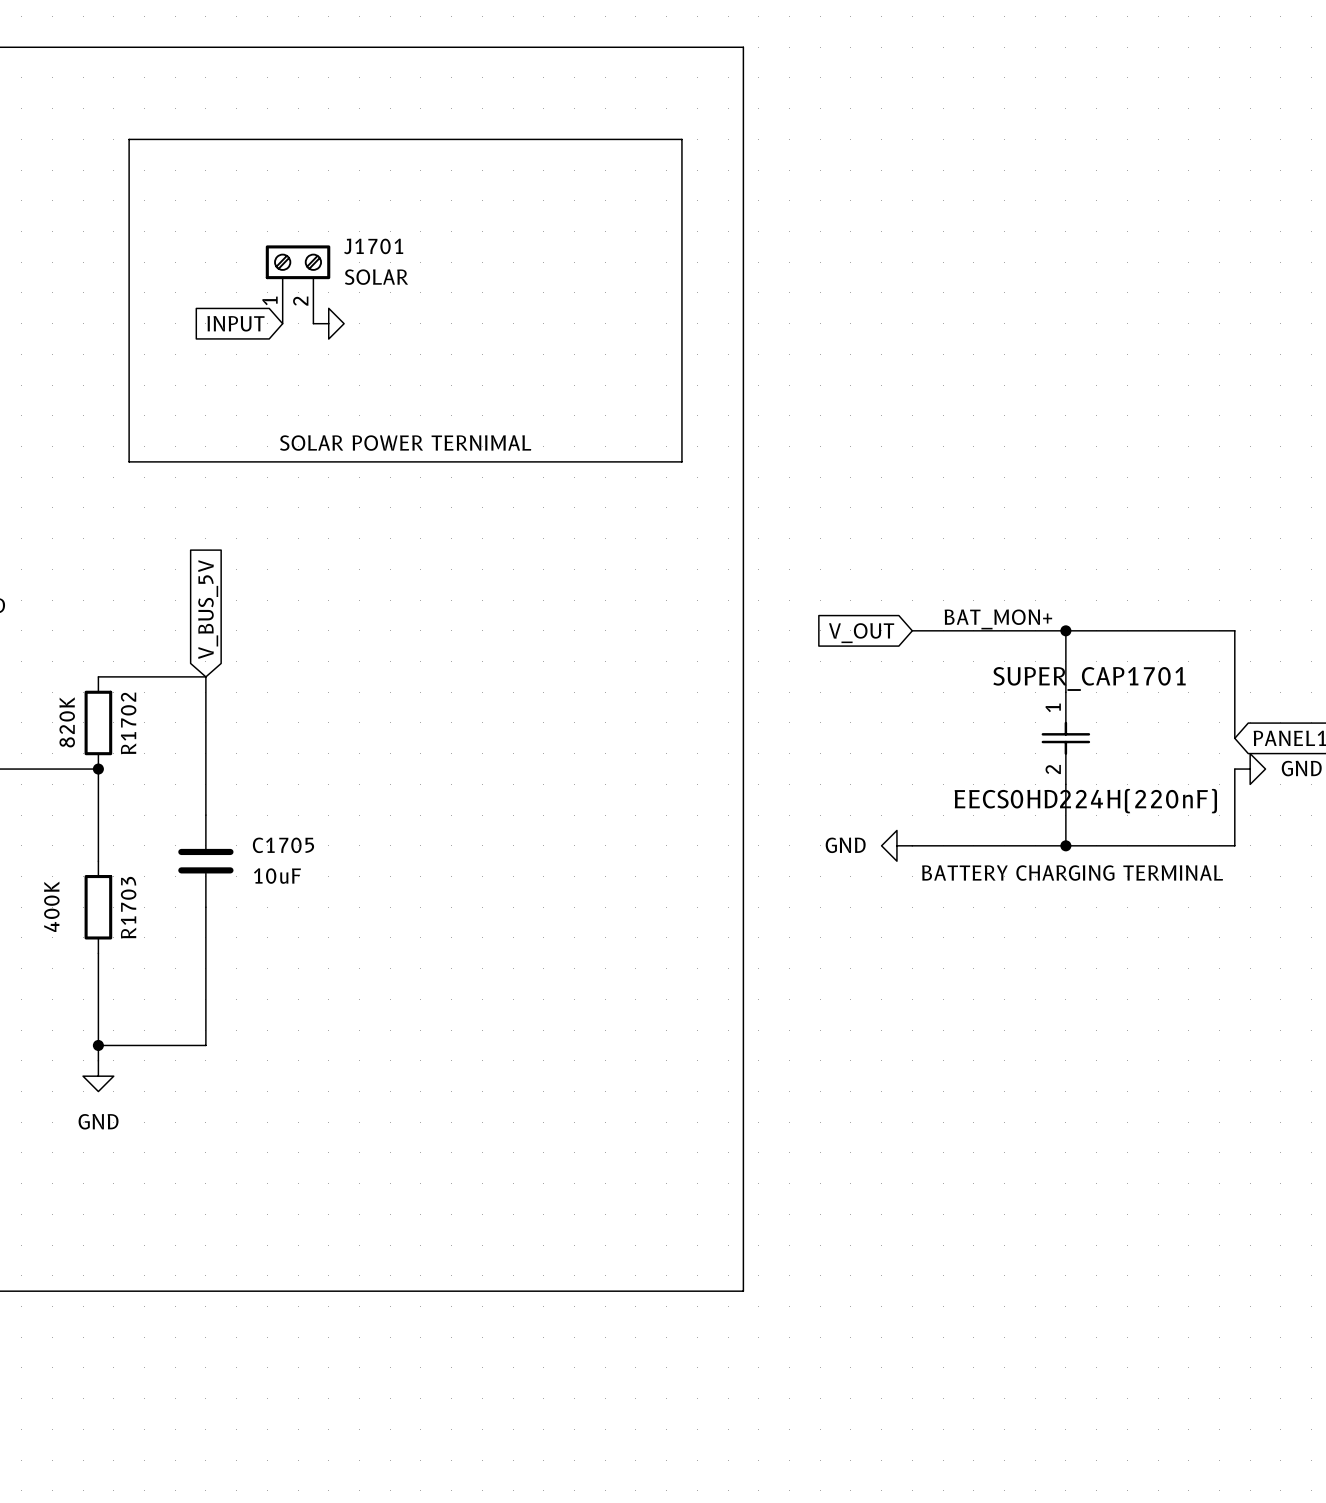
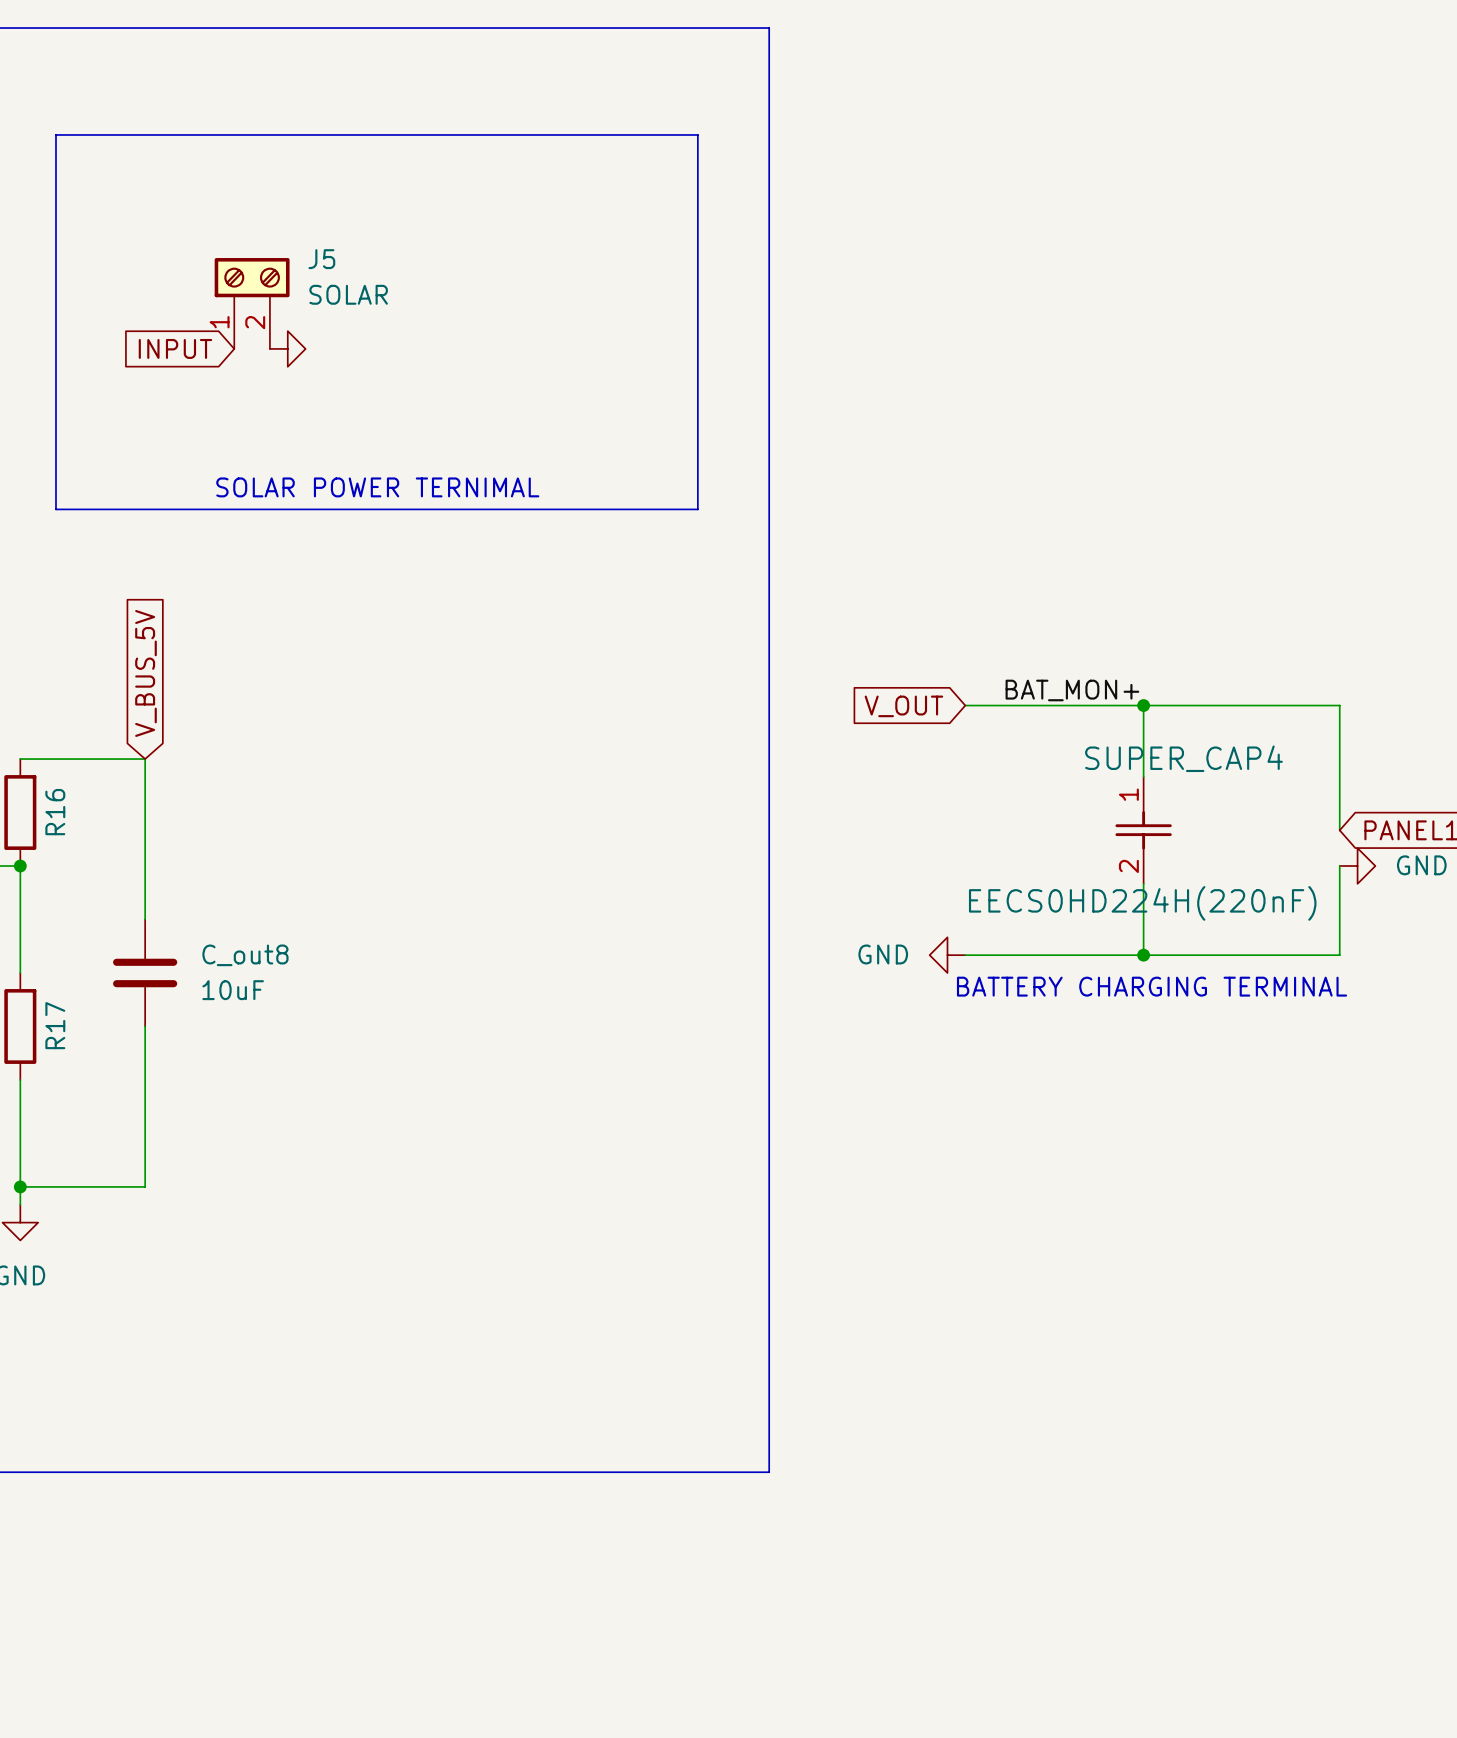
J1701 name: J1701 (373, 246) -> J5 (321, 259)
SUPER_CAP1701 name: SUPER_CAP1701 (1089, 678) -> SUPER_CAP4 (1183, 758)
R1702 name: R1702 (128, 723) -> R16 (55, 812)
C1705 name: C1705 (283, 845) -> C_out8 (245, 955)
R1703 name: R1703 (128, 907) -> R17 (55, 1025)

